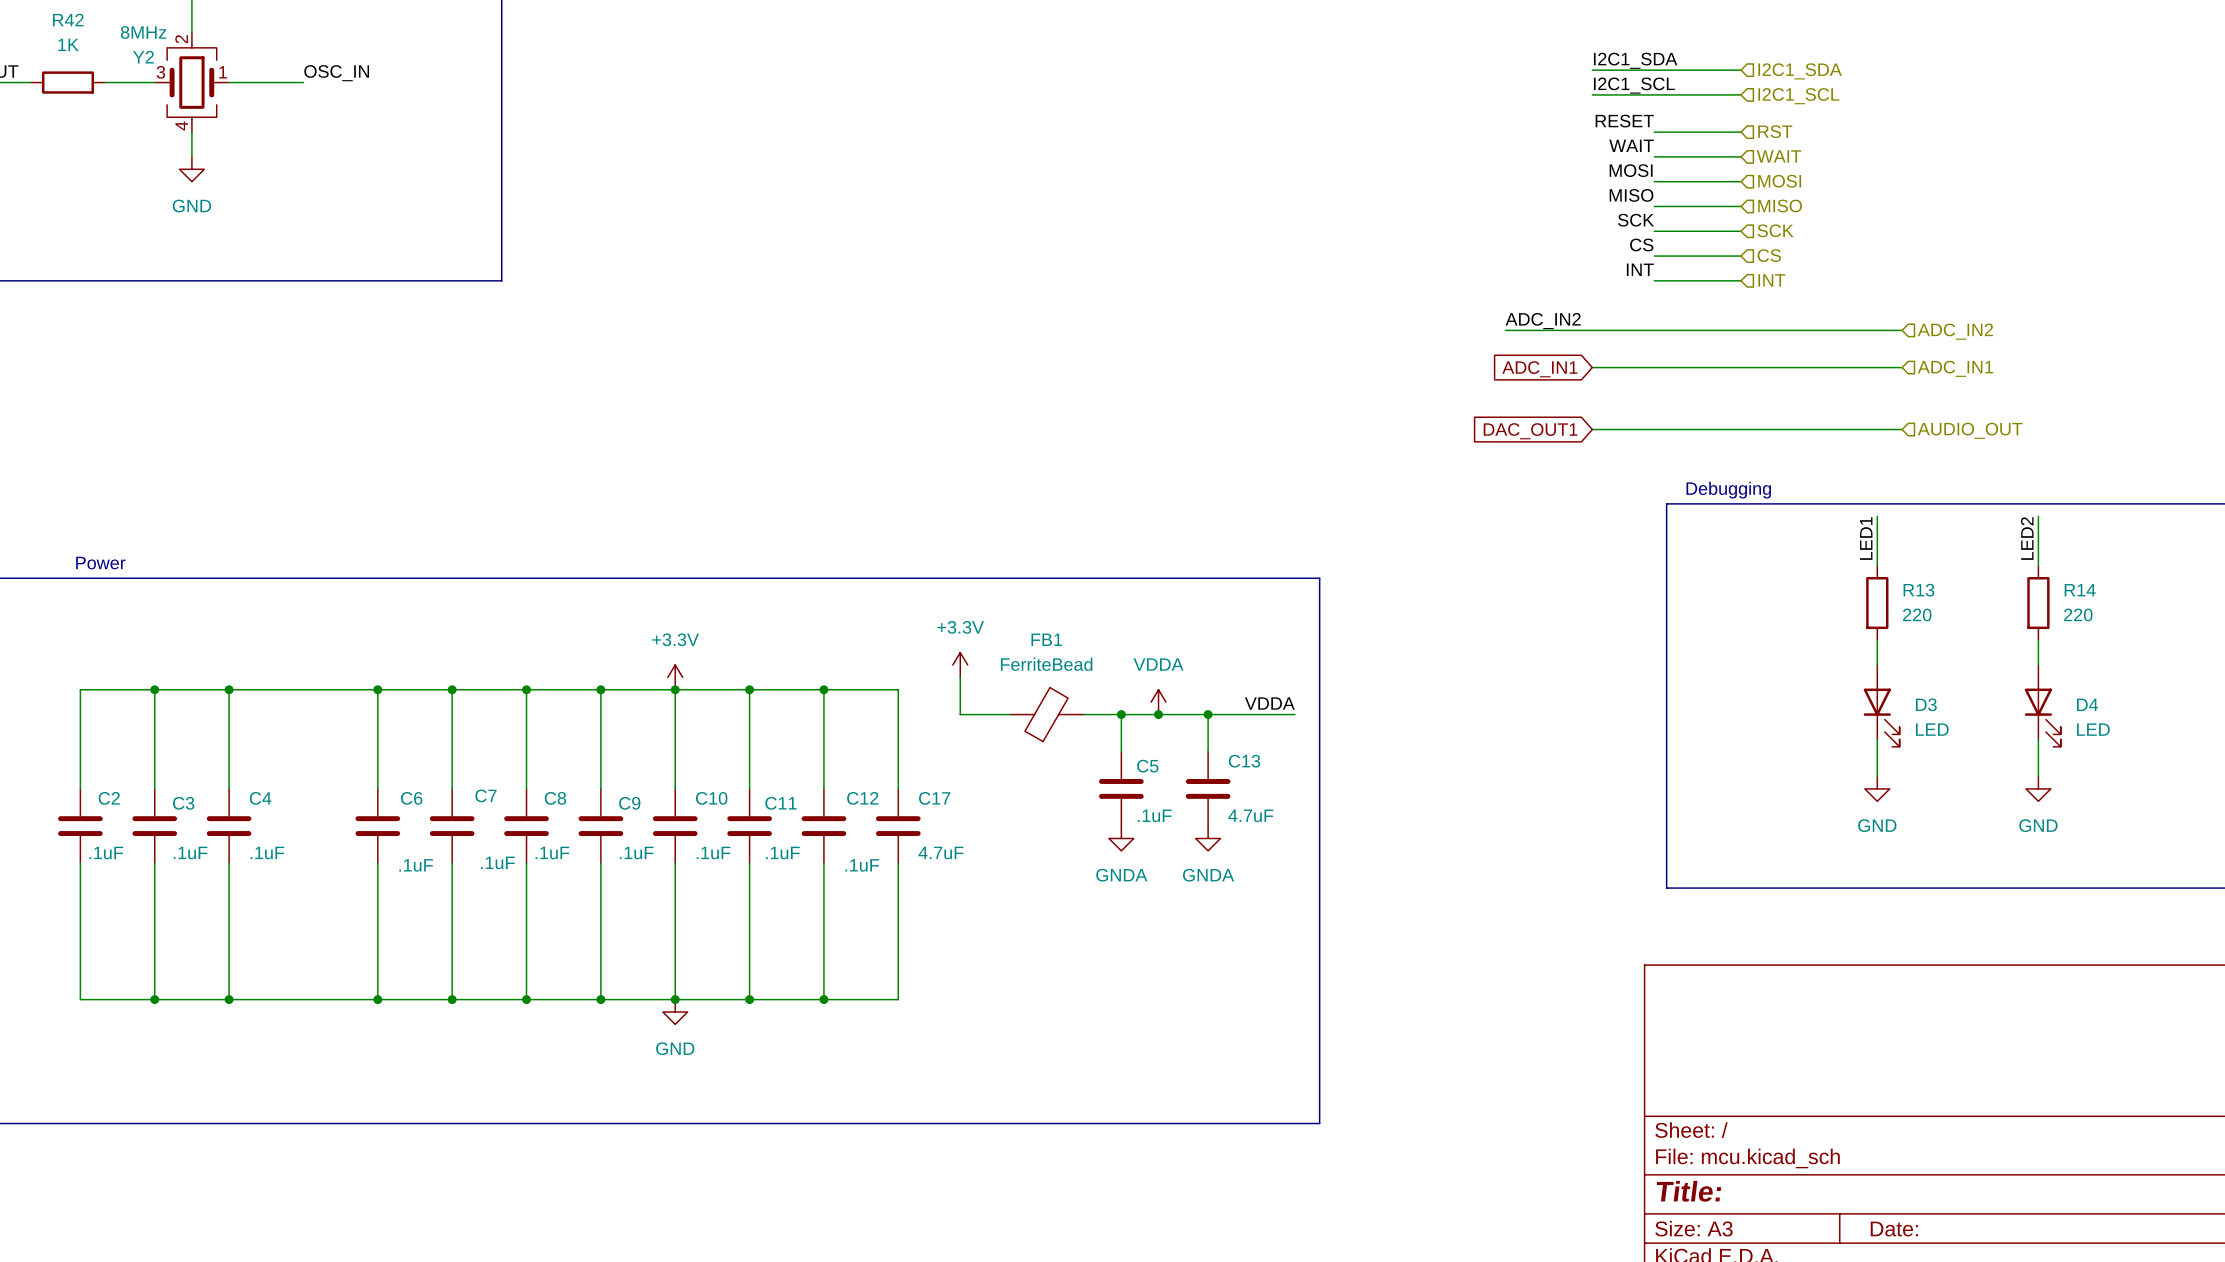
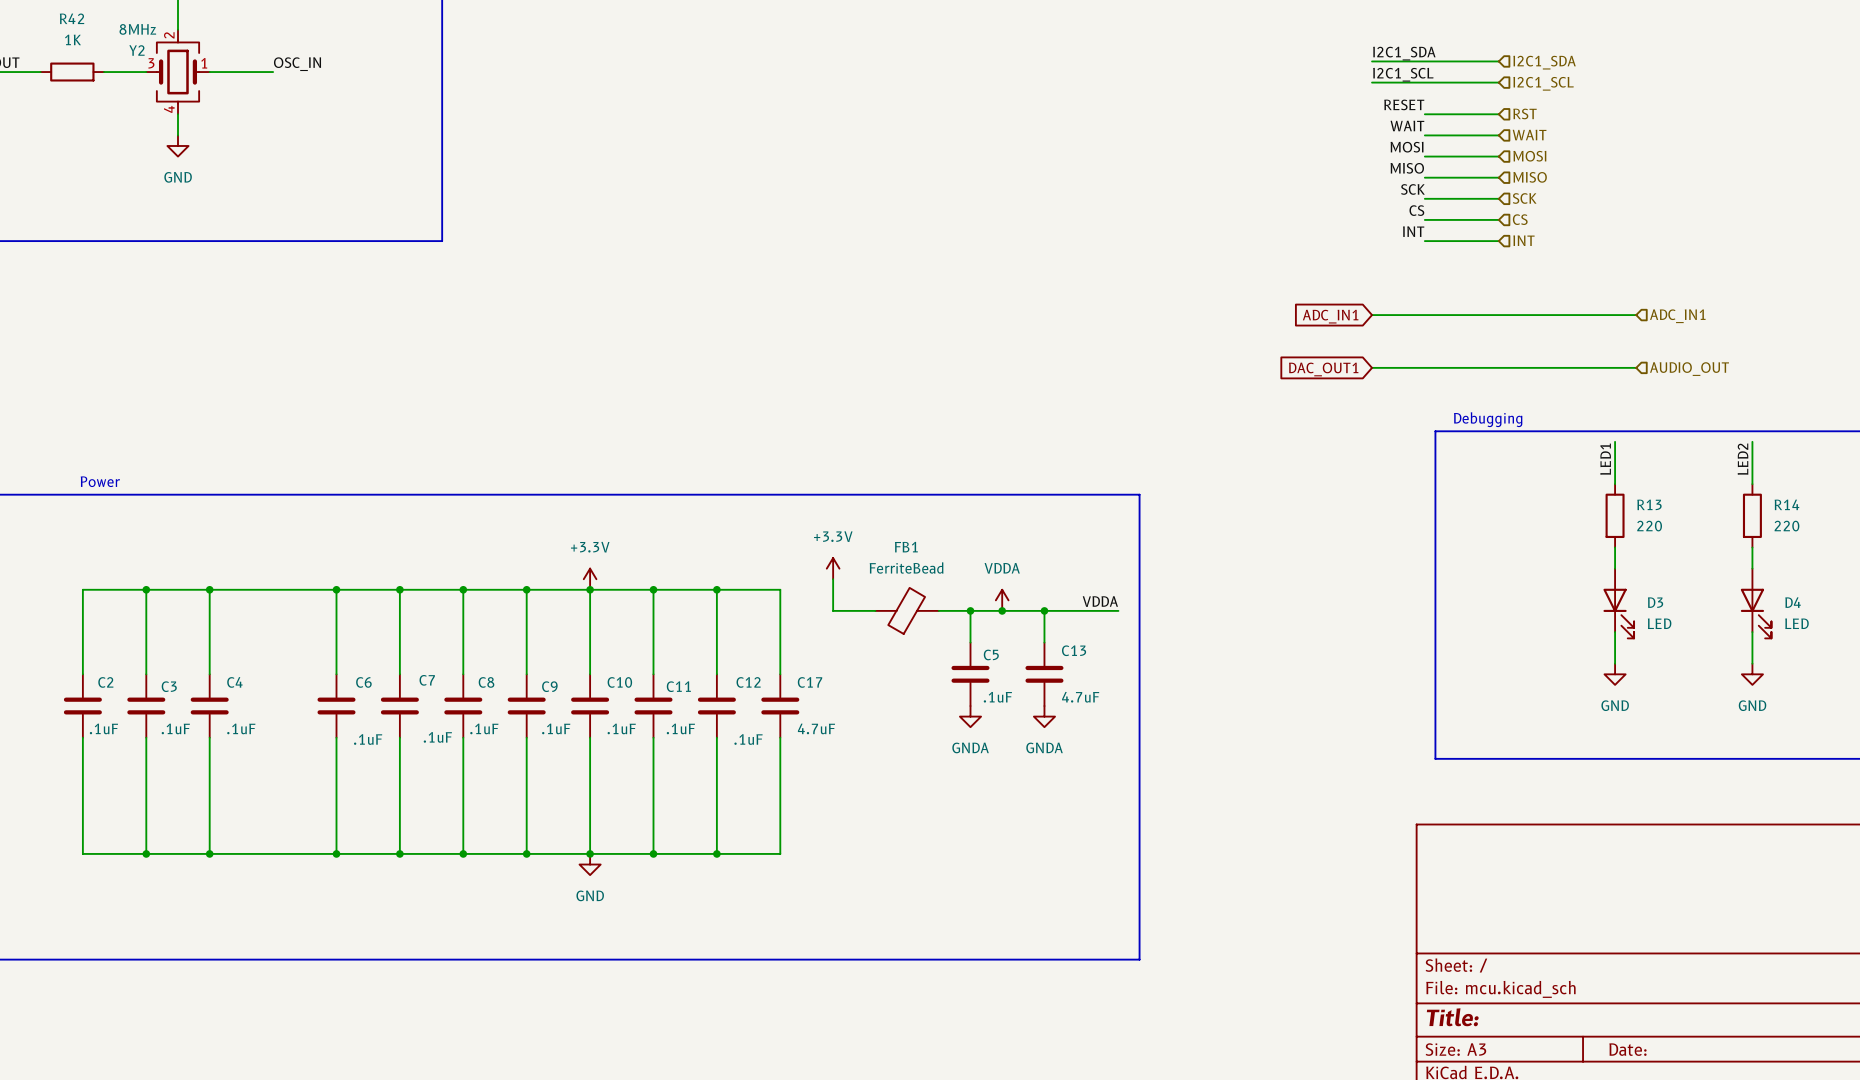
label: ADC_IN2 (1543, 321) -> none
wire: (1505, 330) (1902, 330) -> none
hierarchical label: ADC_IN2 (1955, 331) -> none

